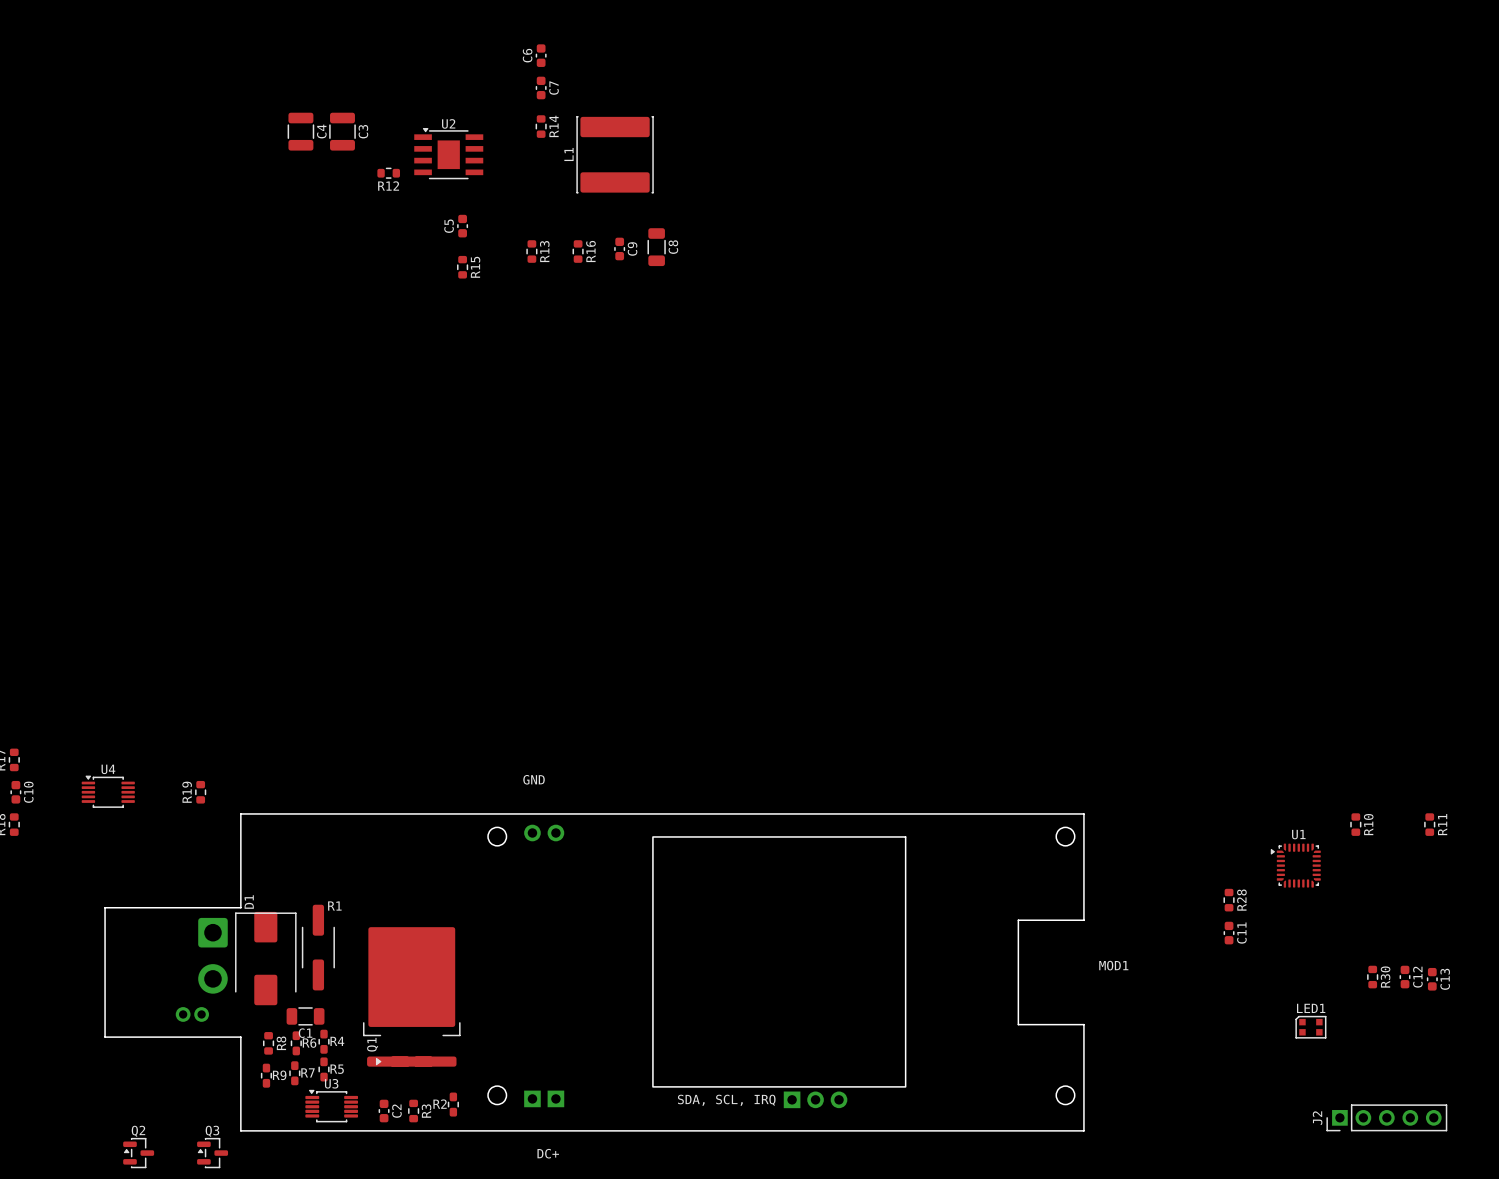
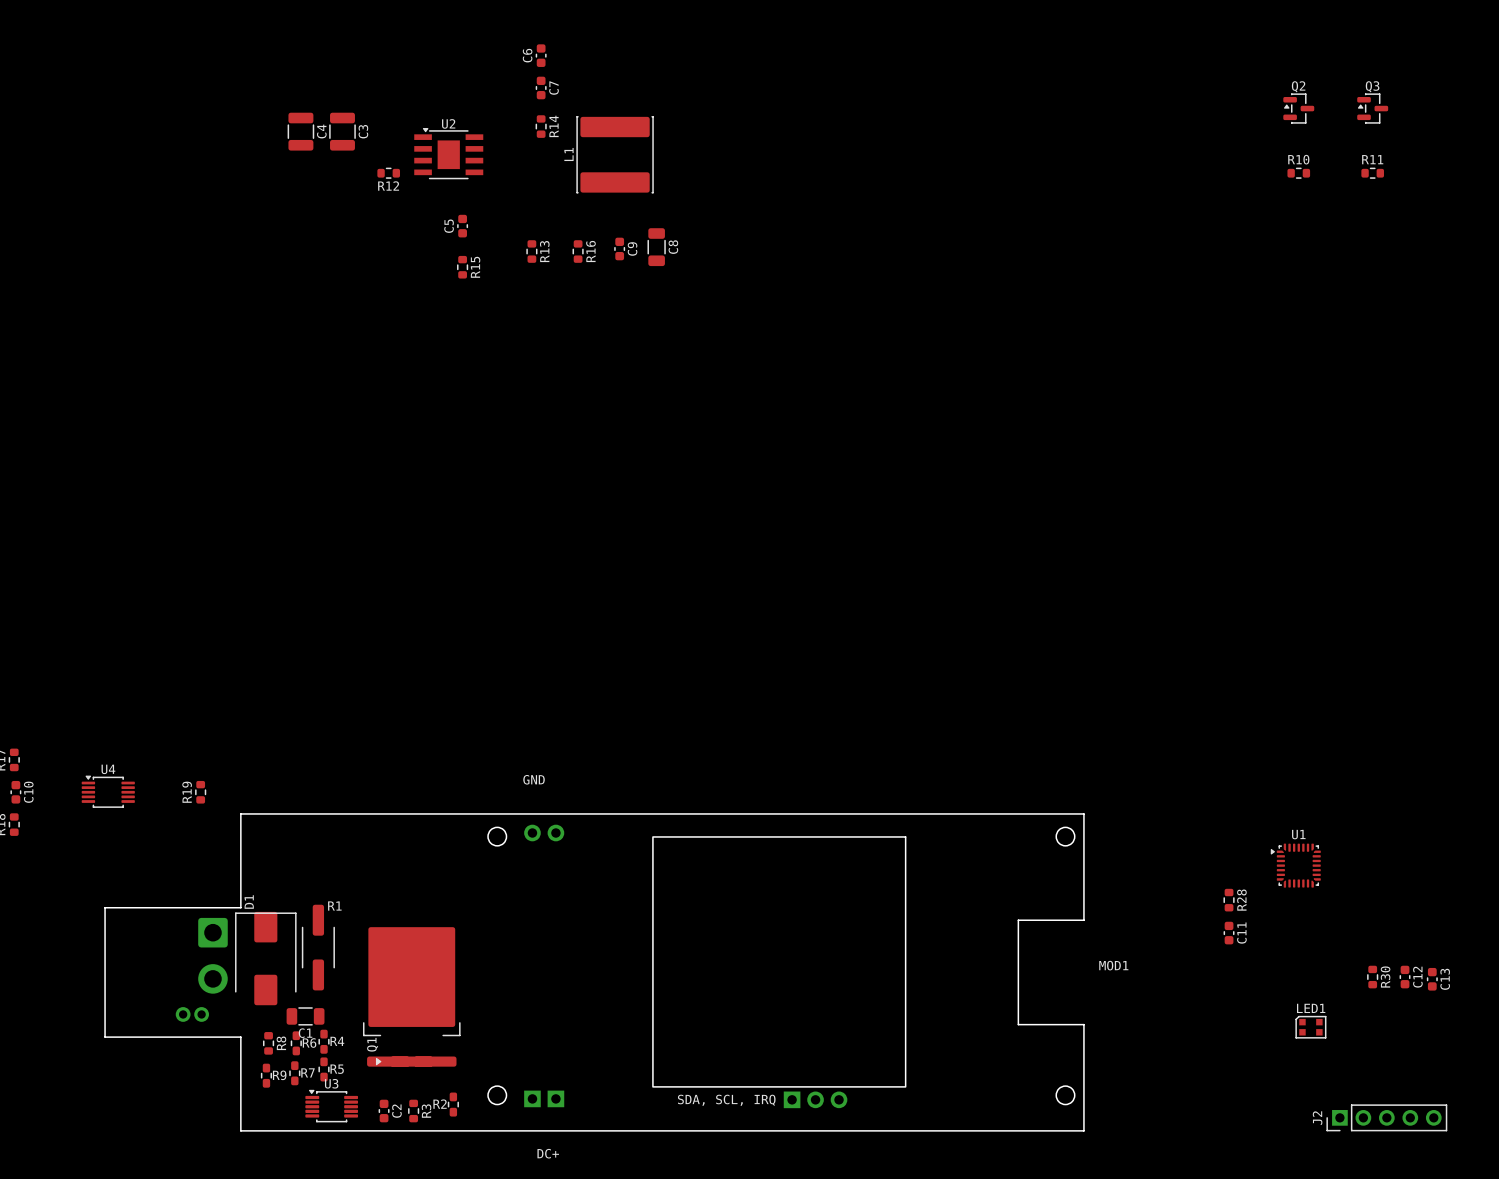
R10 rotation: 0° (1355, 824) -> 90° clockwise (1298, 173)
R10 position: (1355, 824) -> (1298, 173)
R10 name position: R10 (1368, 824) -> R10 (1298, 159)
R11 rotation: 0° (1429, 824) -> 90° clockwise (1372, 173)
R11 position: (1429, 824) -> (1372, 173)
R11 name position: R11 (1442, 824) -> R11 (1372, 159)
Q2 position: (138, 1153) -> (1298, 108)
Q3 position: (212, 1153) -> (1372, 108)

